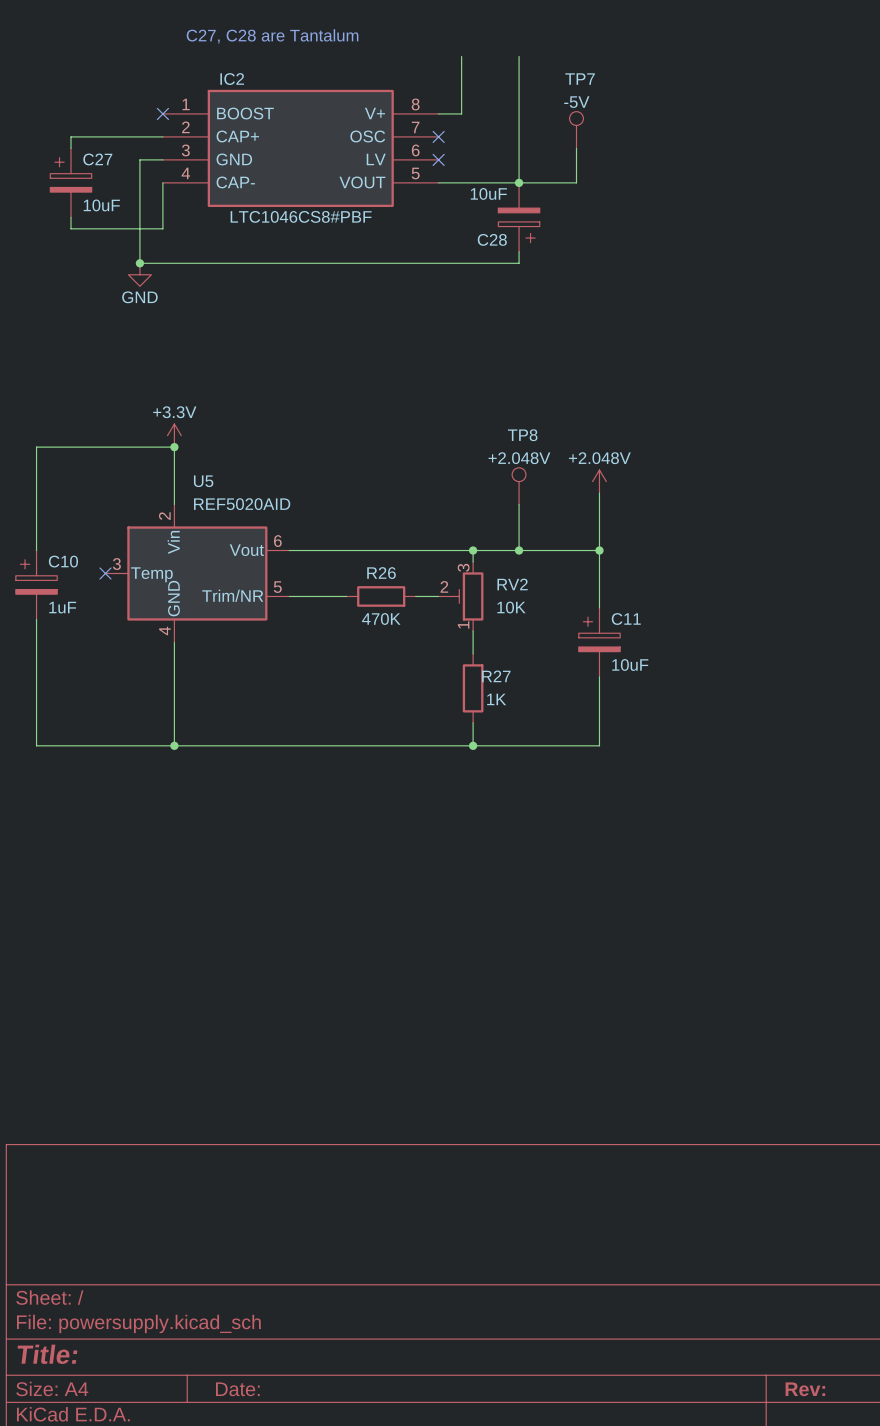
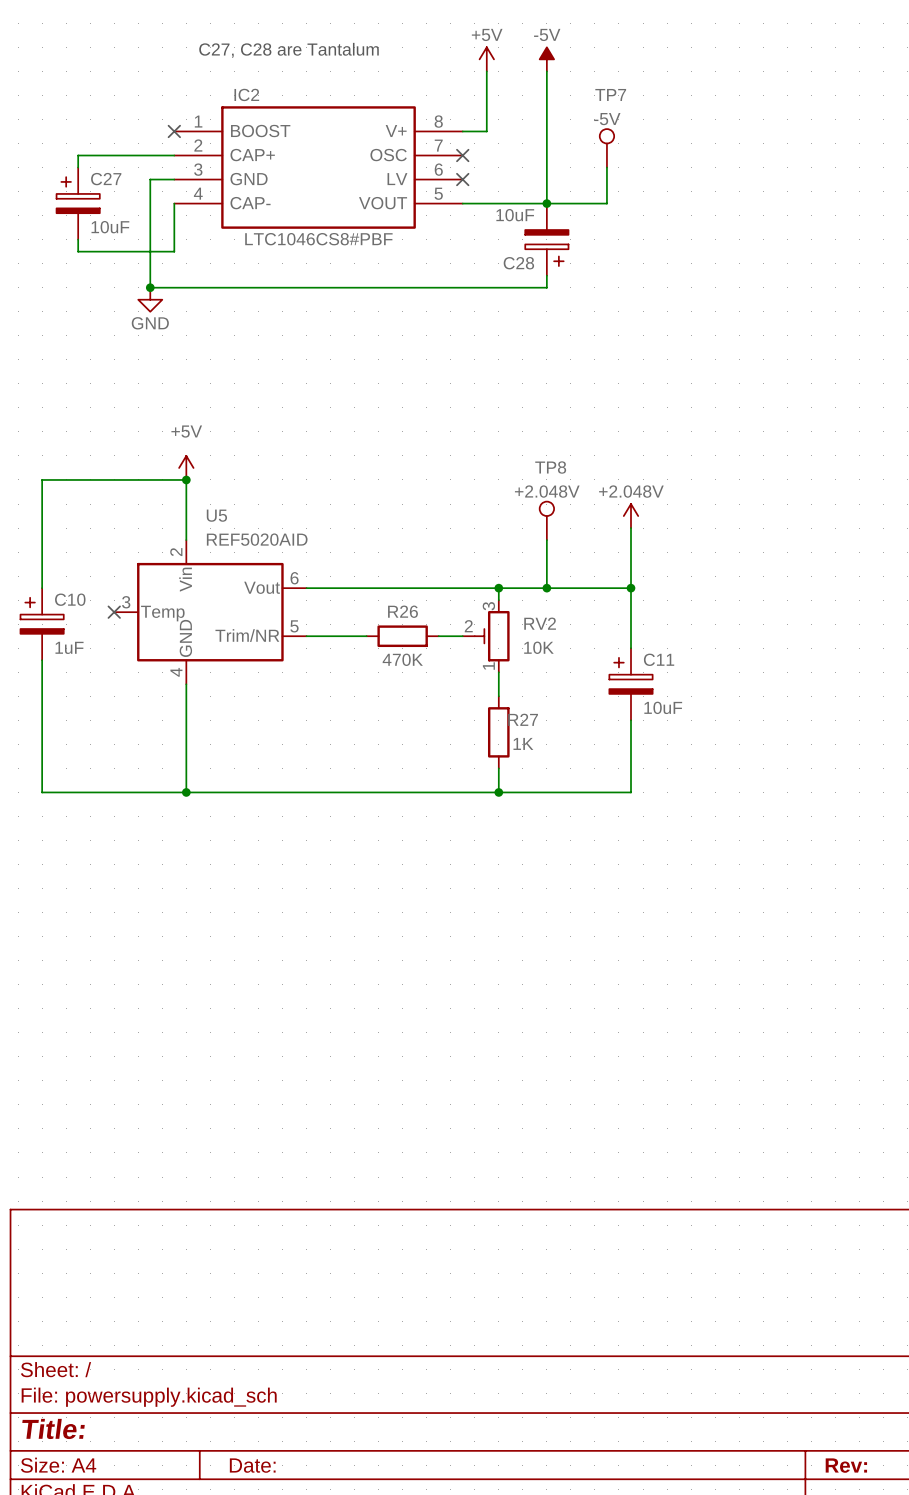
power symbol: none -> +5V (486, 59)
power symbol: none -> -5V (546, 59)
power symbol: +3.3V (174, 435) -> +5V (186, 467)

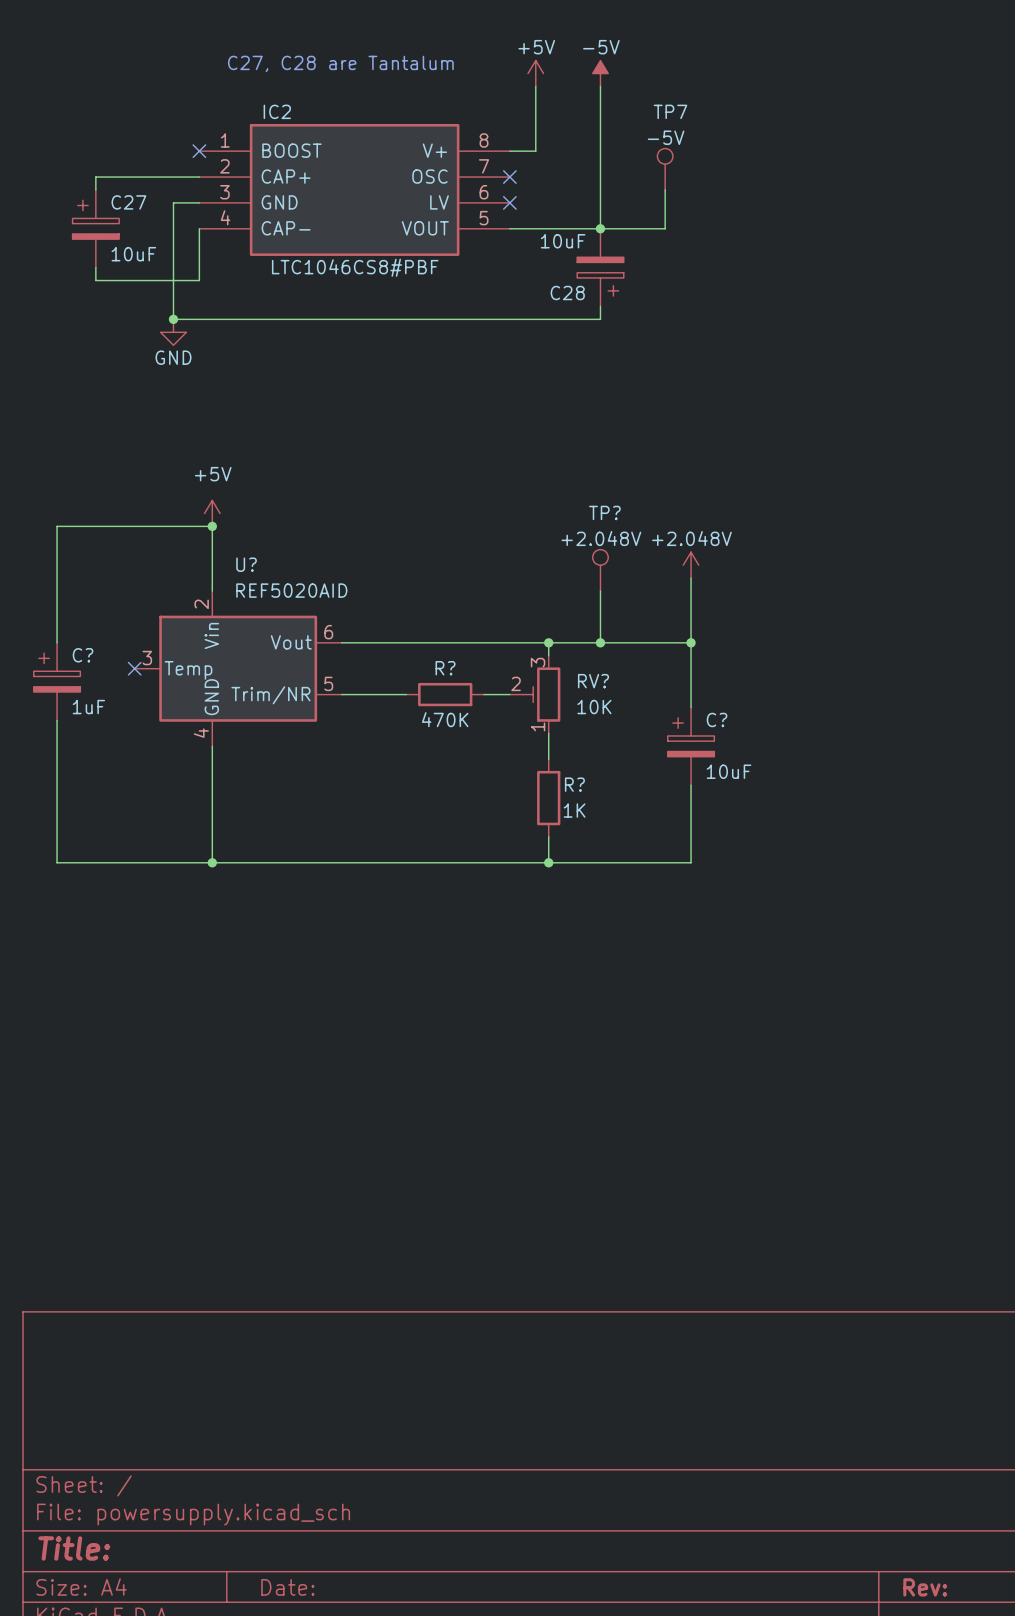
TP8 name: TP8 (550, 467) -> TP? (604, 512)
U5 name: U5 (216, 515) -> U? (246, 564)
C10 name: C10 (70, 599) -> C? (83, 655)
R26 name: R26 (402, 611) -> R? (445, 668)
RV2 name: RV2 (540, 623) -> RV? (593, 681)
C11 name: C11 (659, 659) -> C? (717, 719)
R27 name: R27 (523, 719) -> R? (574, 784)

